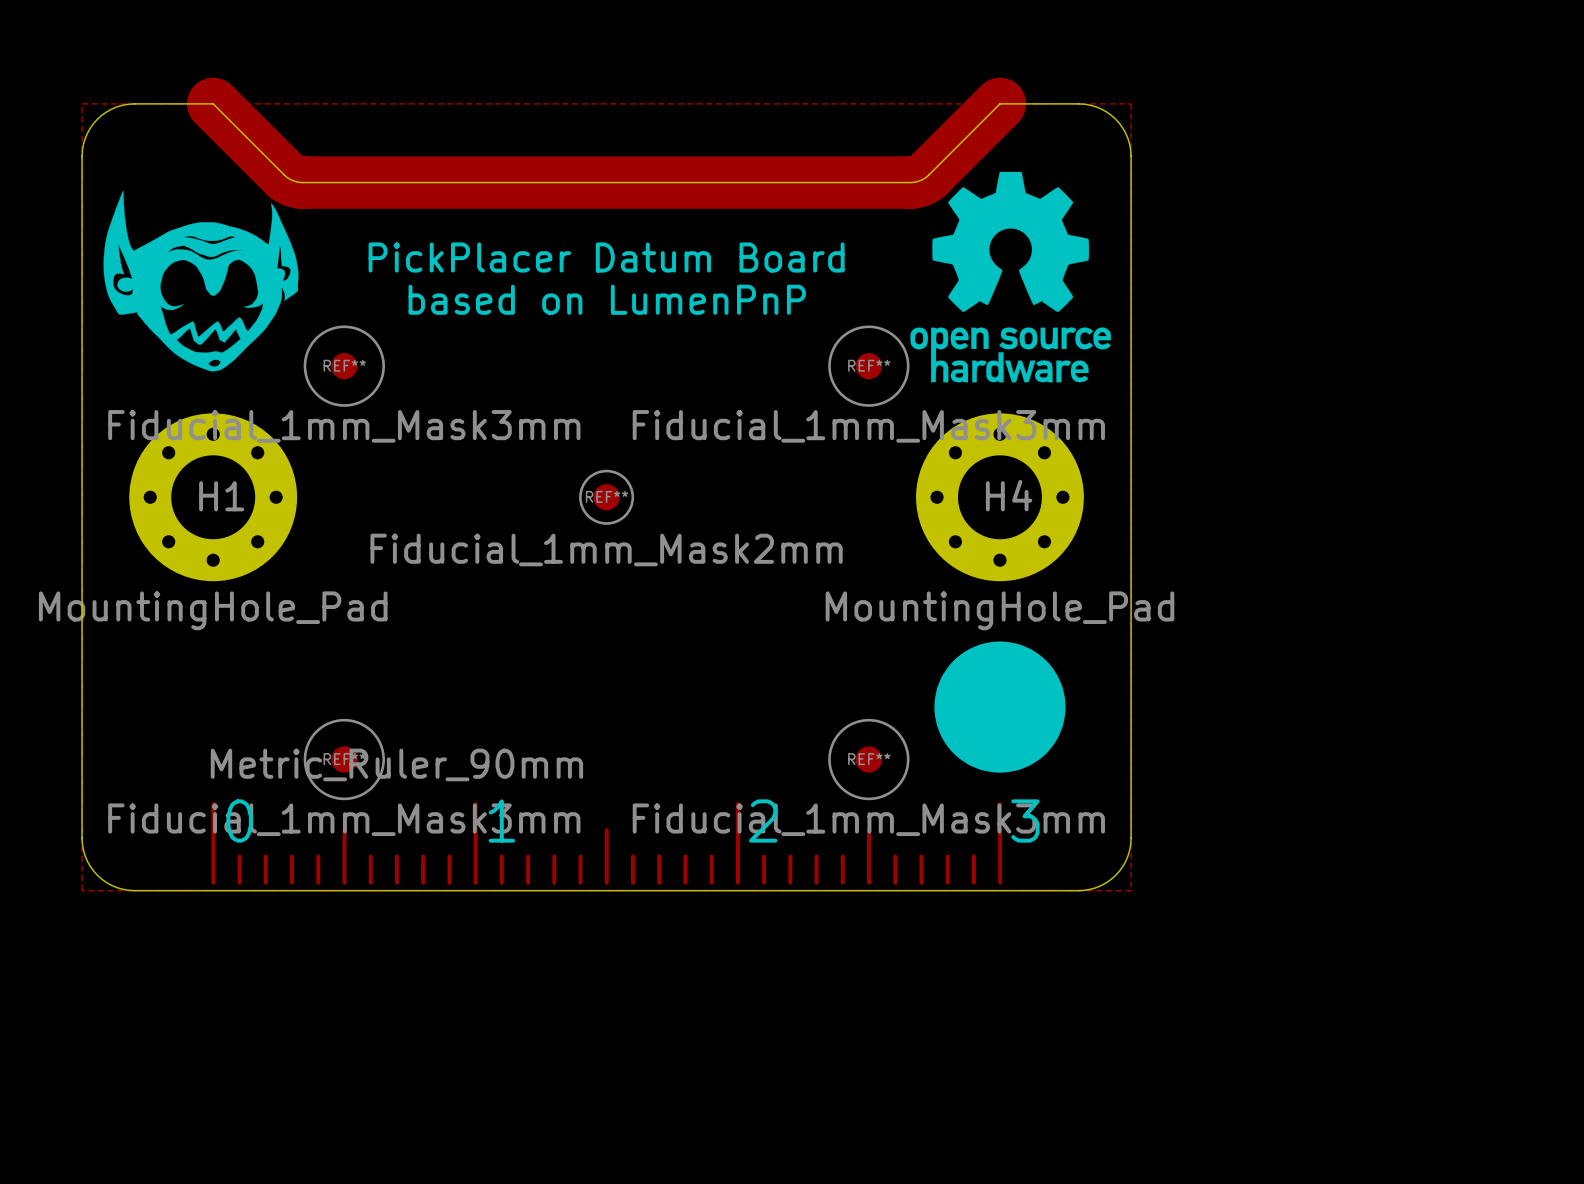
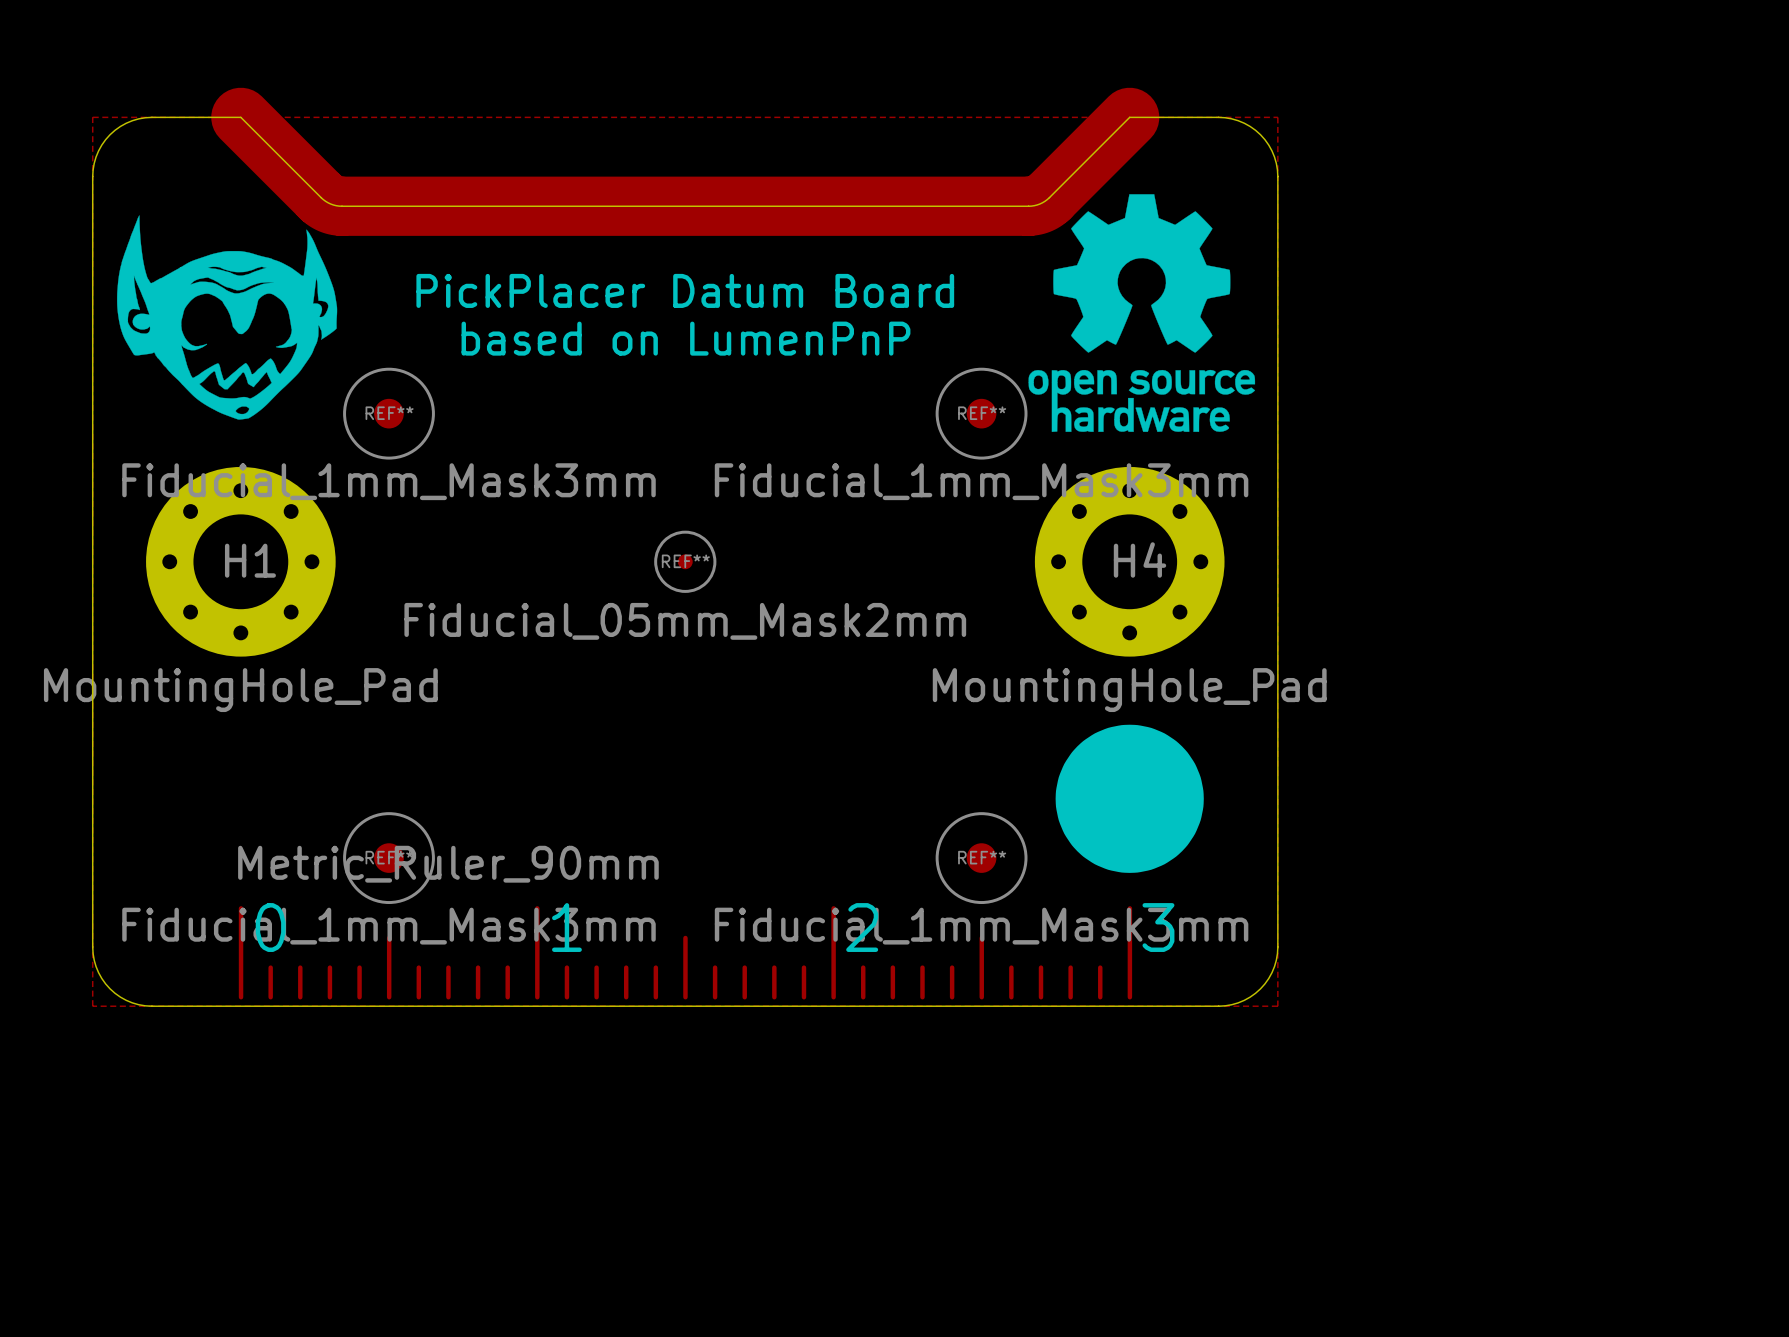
REF** footprint: [579, 469, 635, 525] -> [654, 530, 717, 593]
REF** value: Fiducial_1mm_Mask2mm (606, 549) -> Fiducial_05mm_Mask2mm (685, 621)

